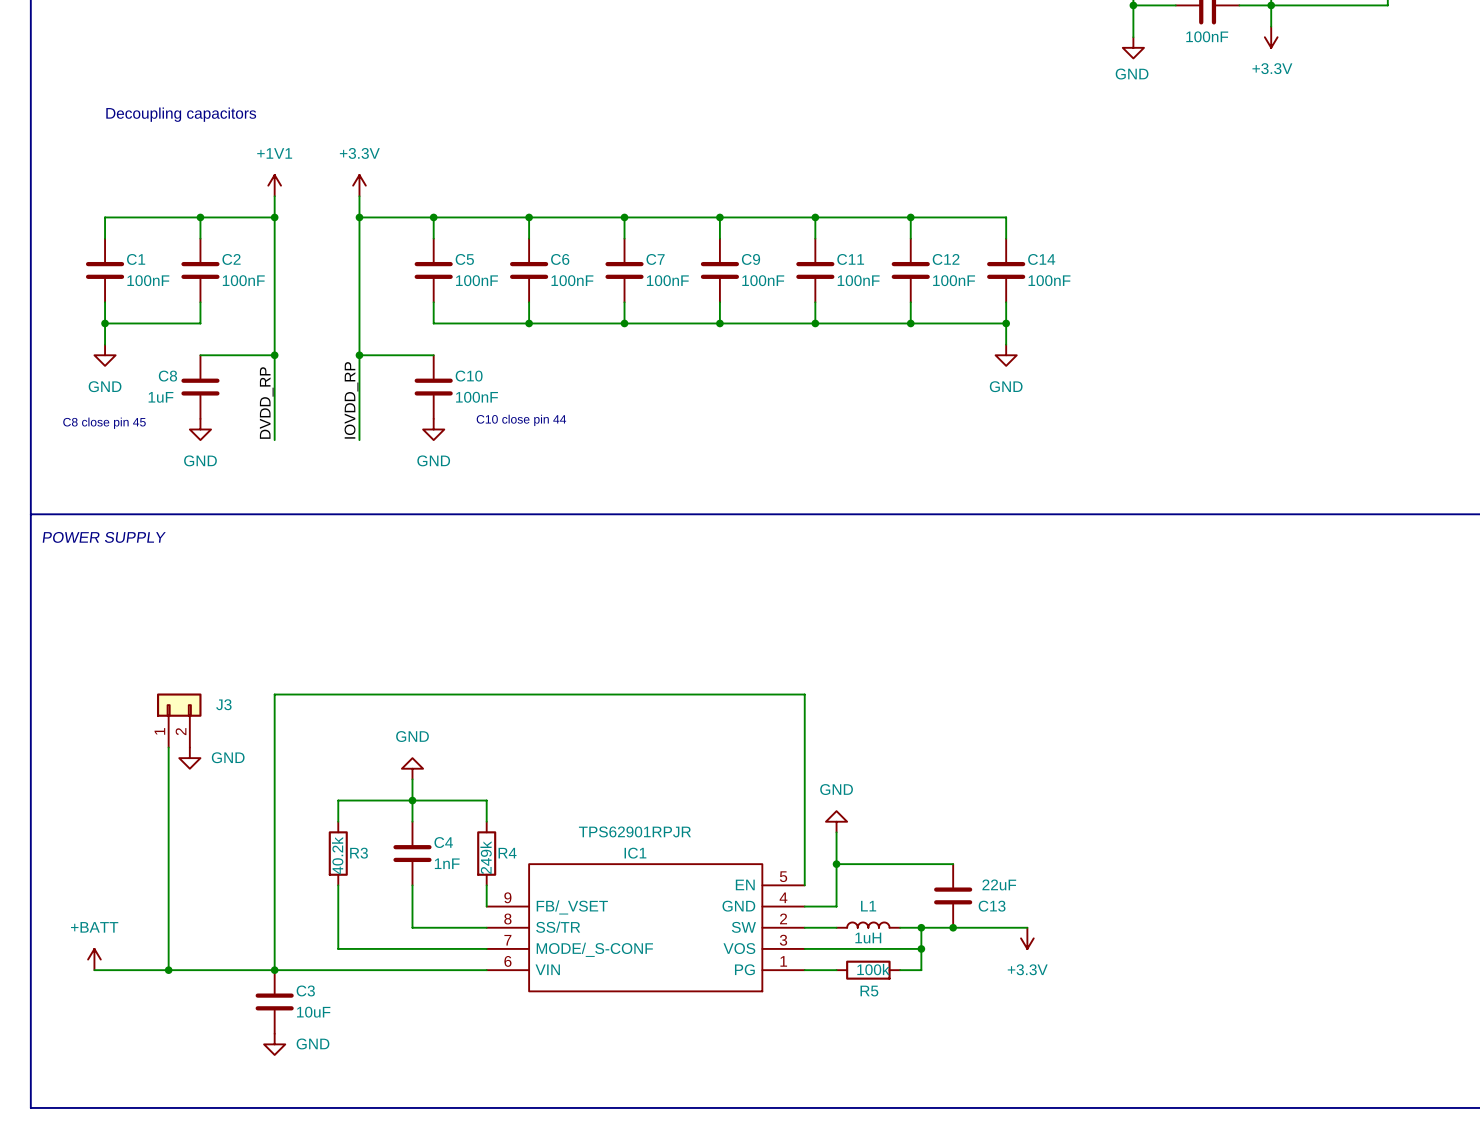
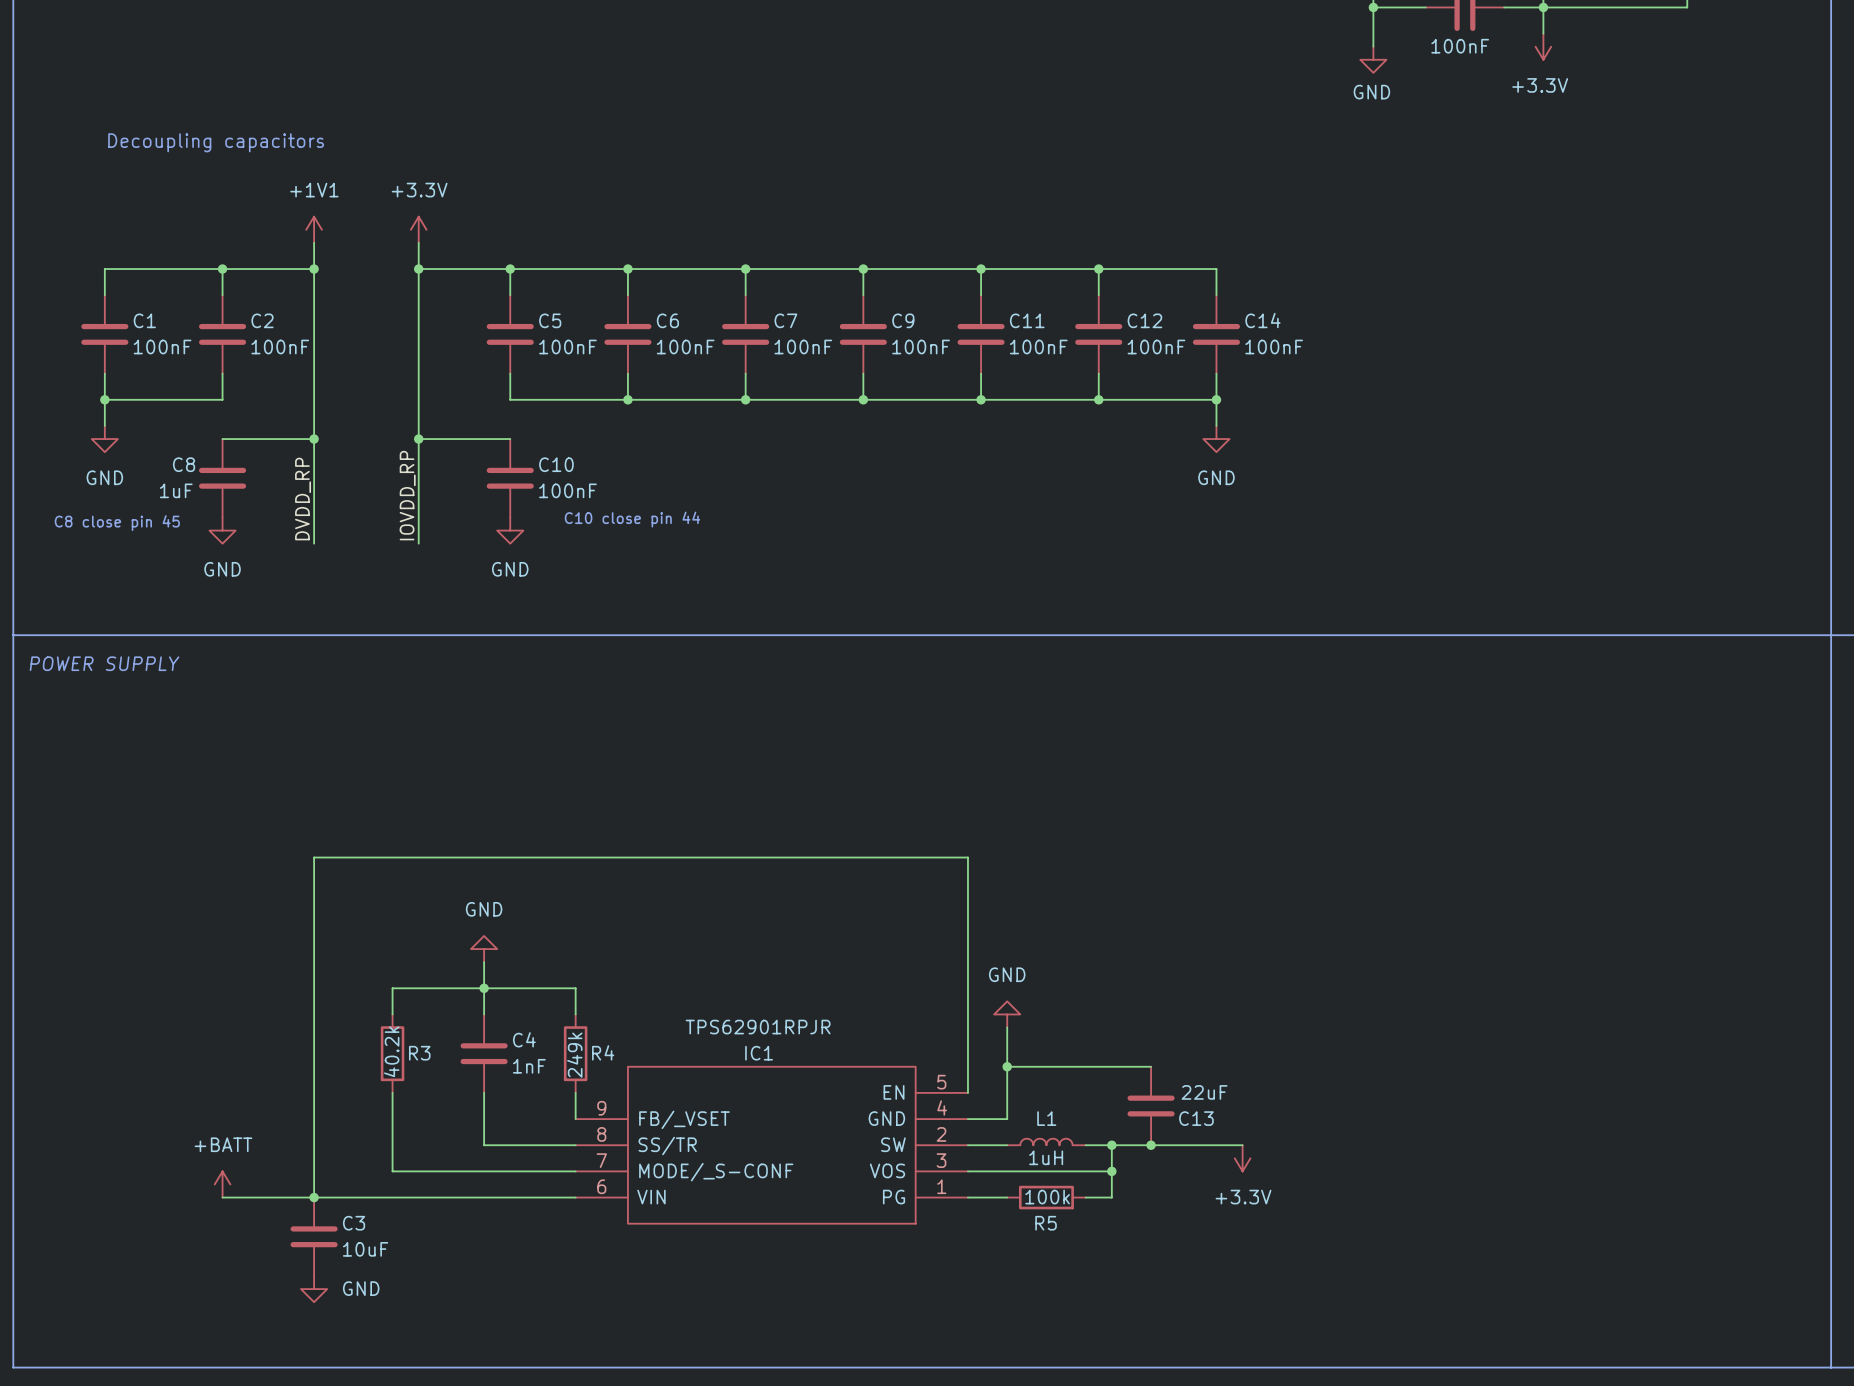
J3: (179, 720) -> none
wire: (168, 747) (168, 970) -> none
power symbol: GND (189, 758) -> none
power symbol position: +BATT (94, 959) -> +BATT (222, 1184)
wire: (94, 970) (200, 970) -> none
junction: (168, 970) -> none

